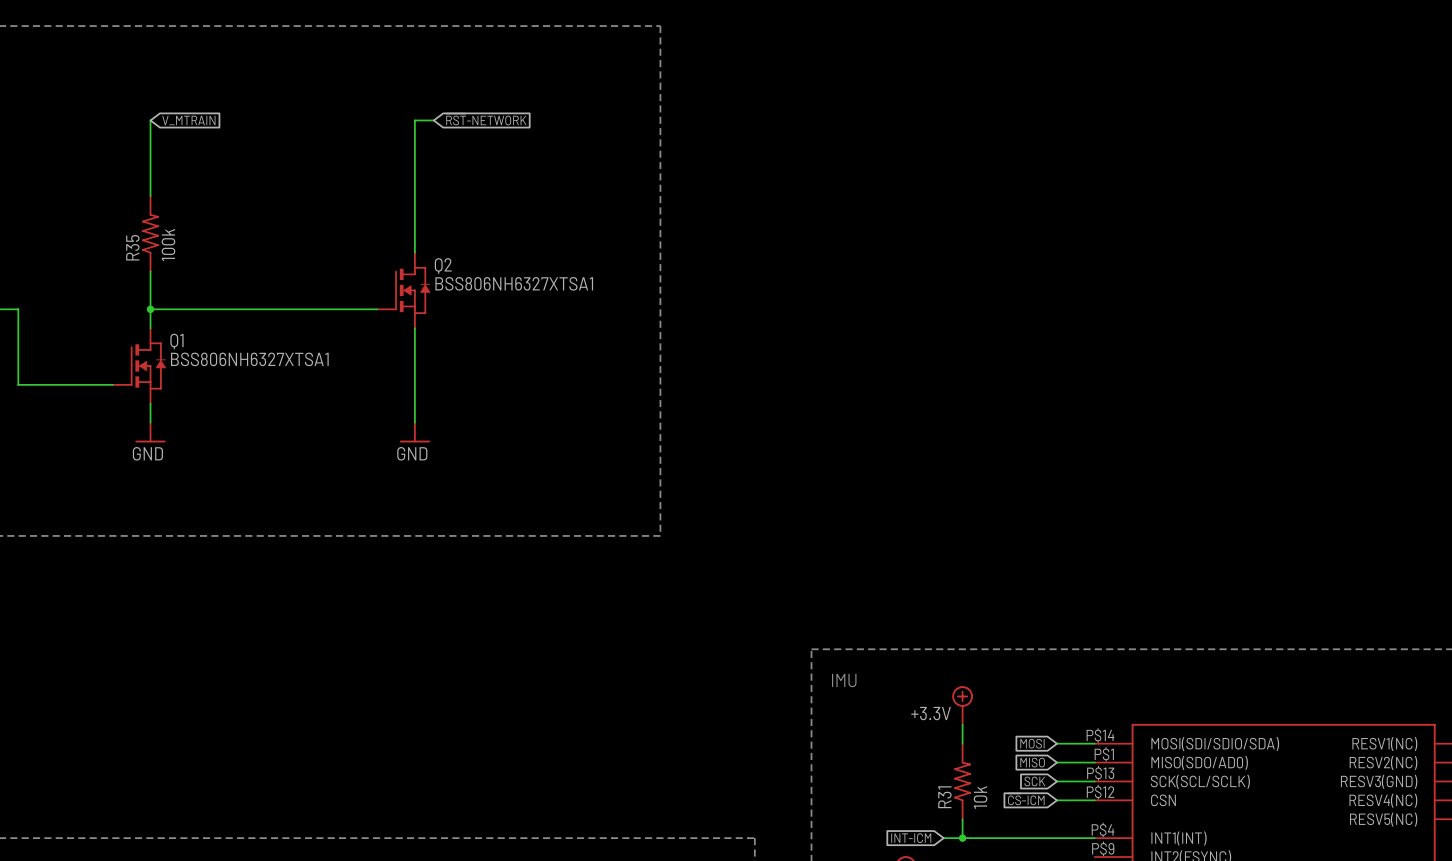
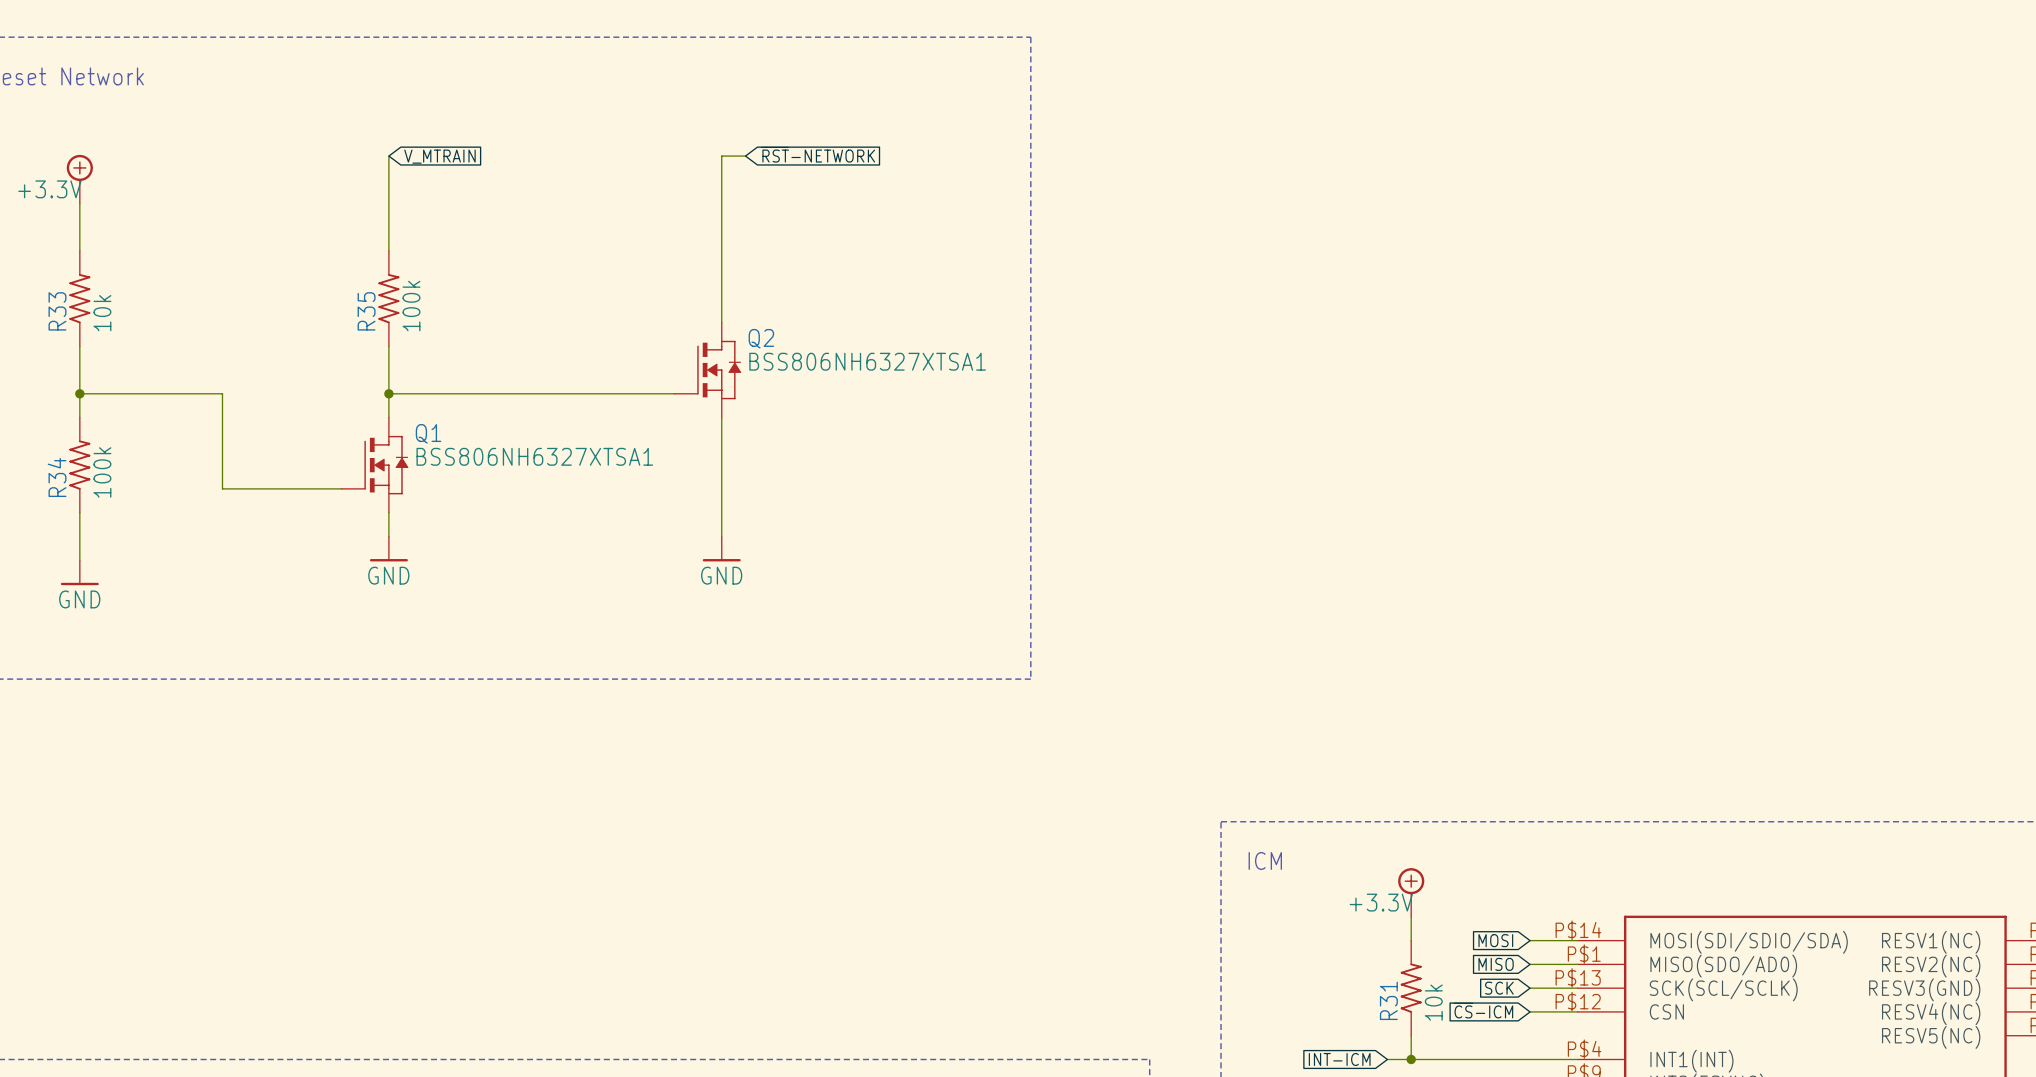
text: IMU (844, 680) -> ICM (1265, 860)

